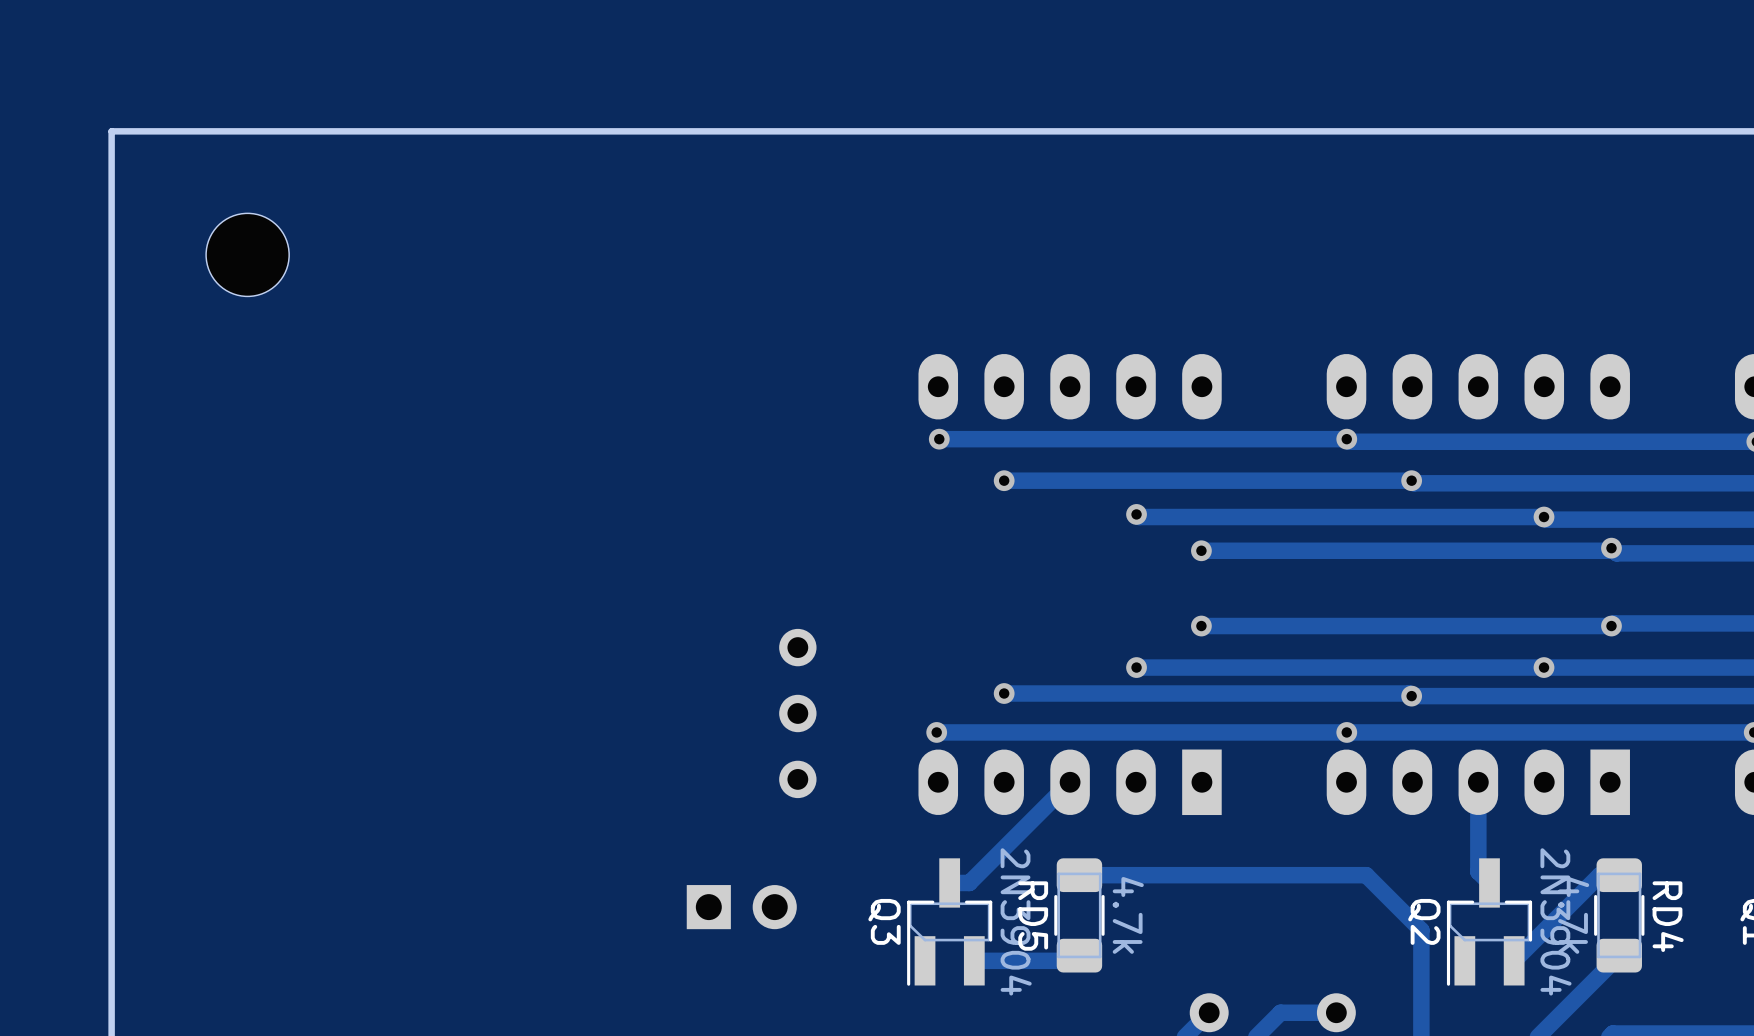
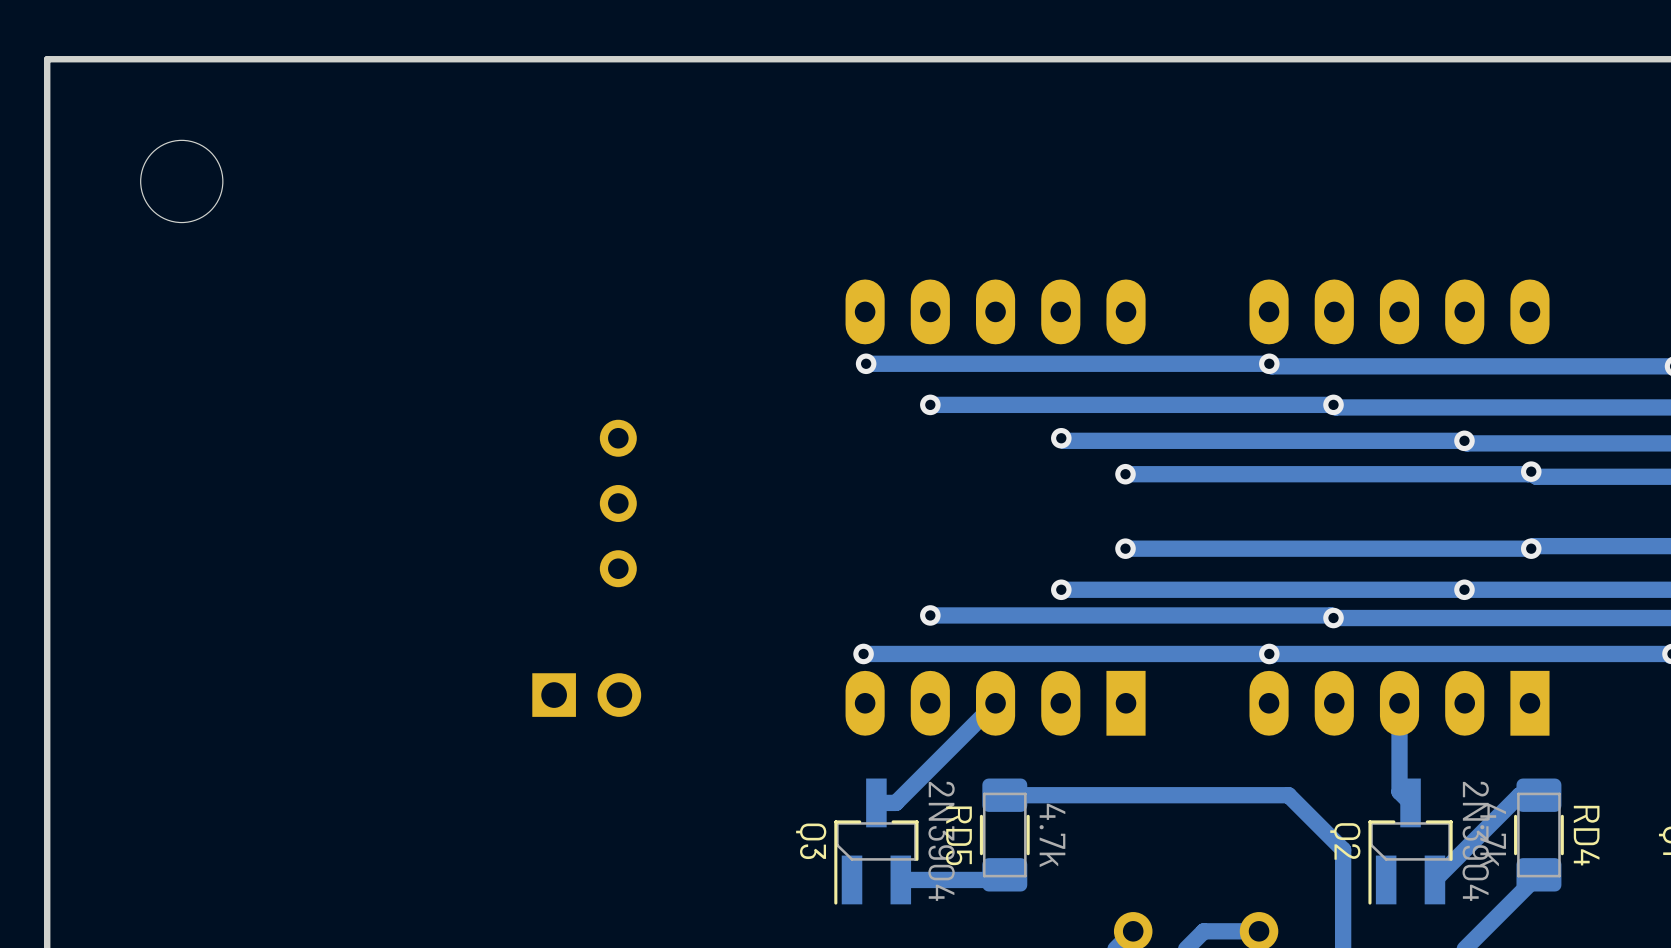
part position: (797, 713) -> (618, 503)
part position: (741, 907) -> (586, 695)

